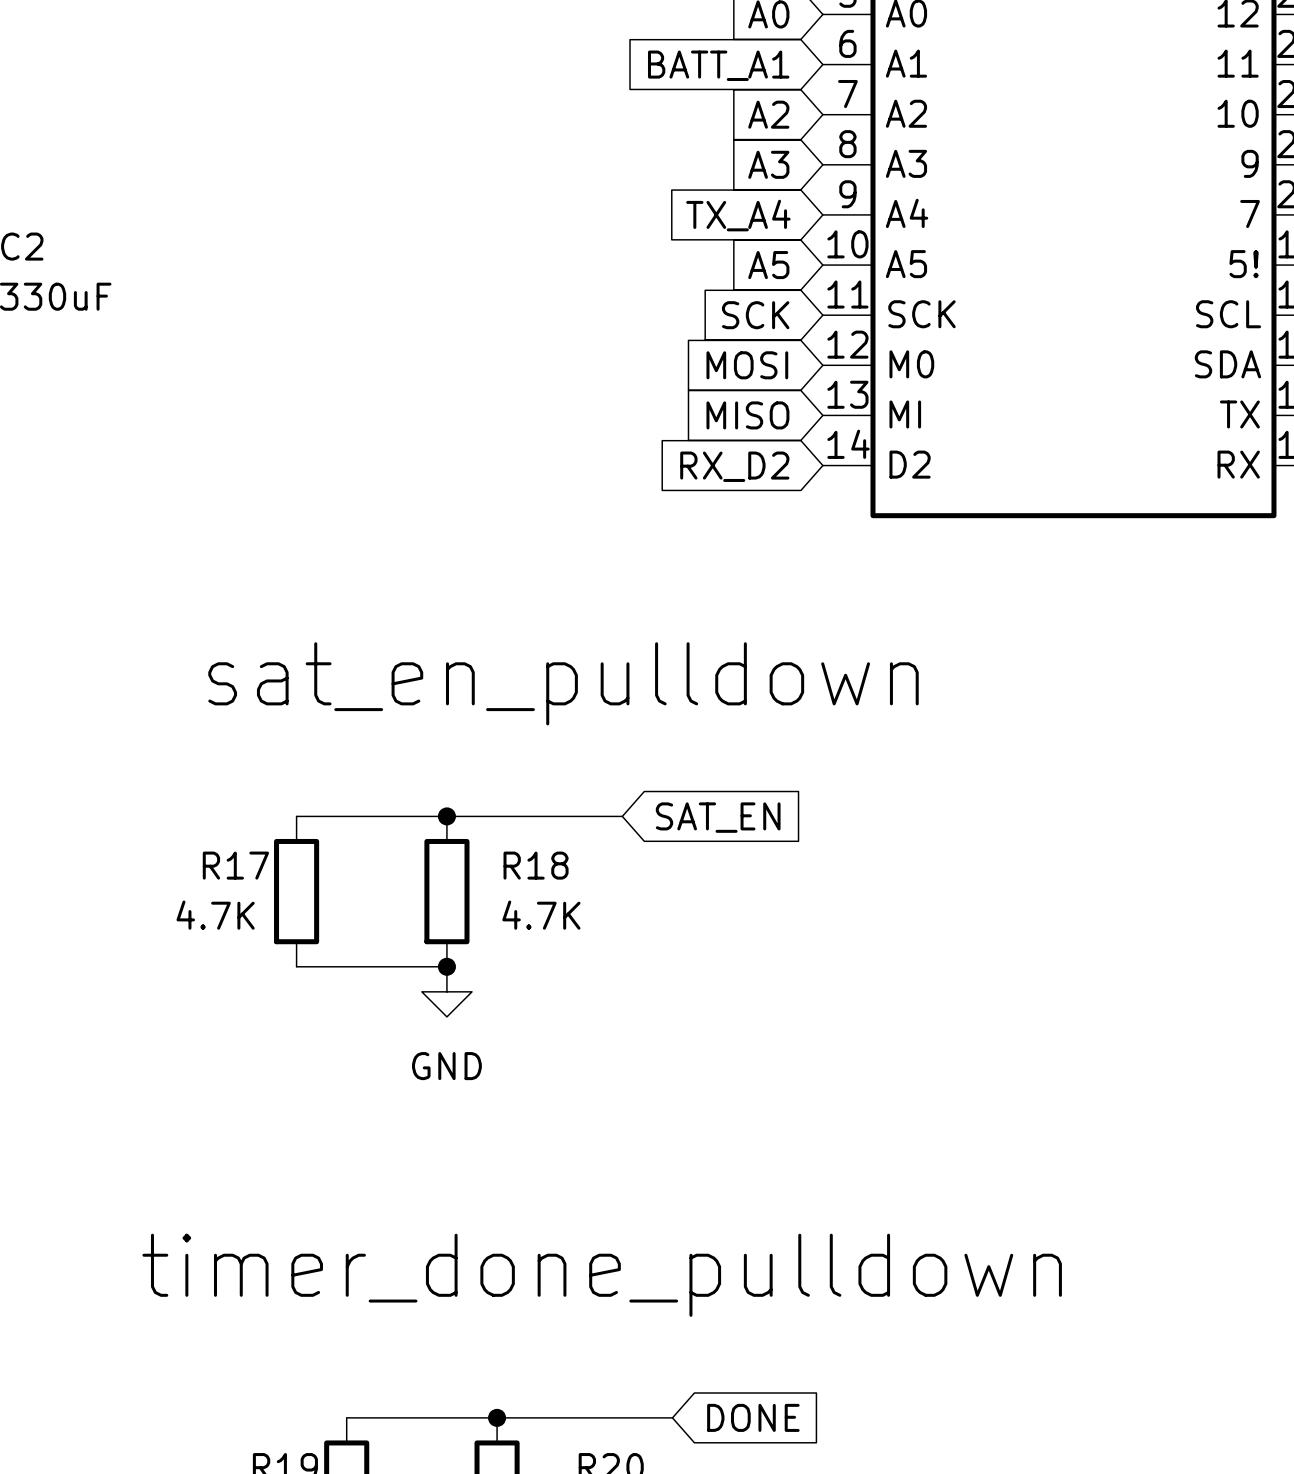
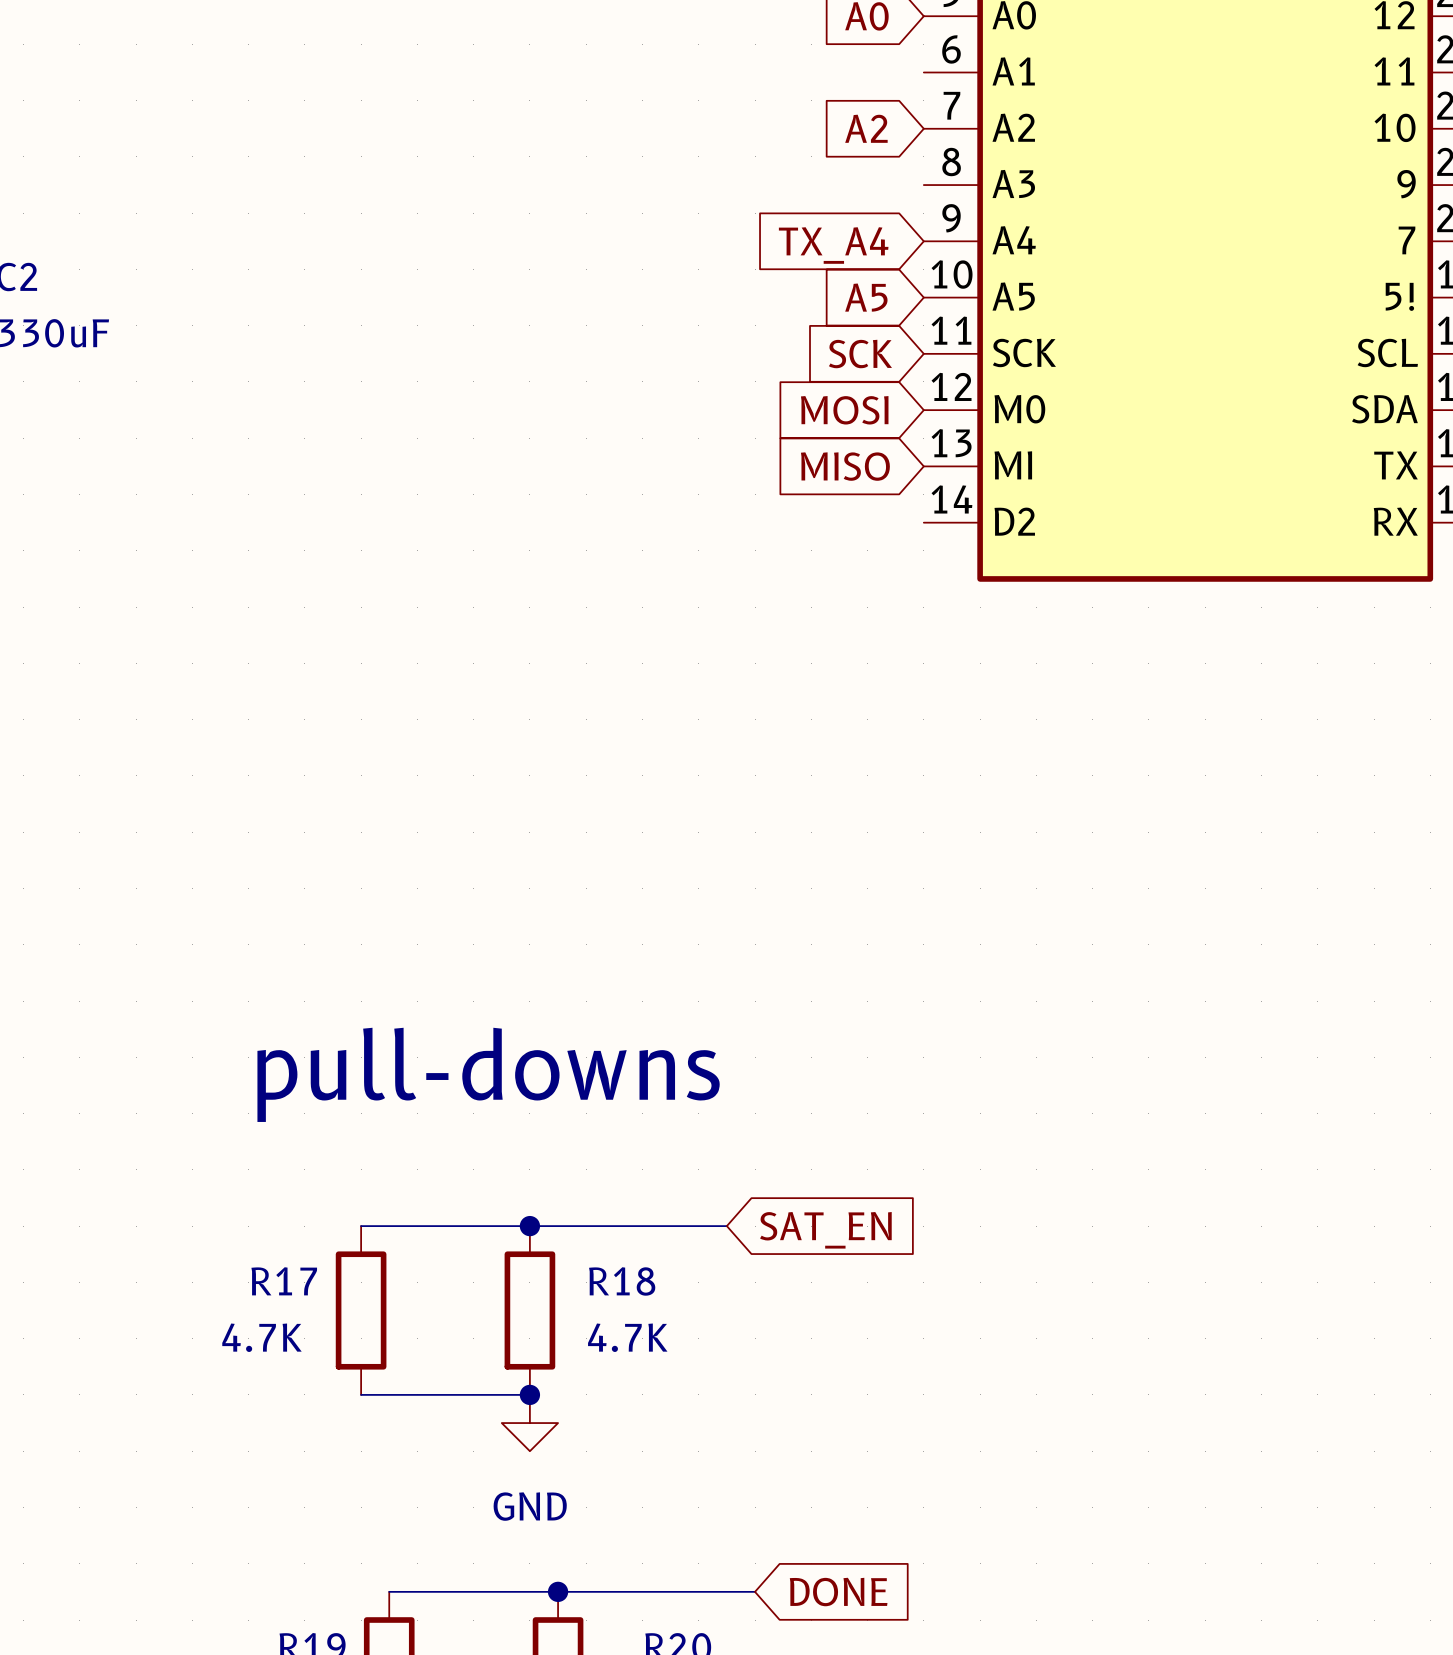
global label: BATT_A1 (718, 65) -> none
global label: A3 (768, 164) -> none
global label: RX_D2 (734, 466) -> none
text: sat_en_pulldown (563, 683) -> none
wire: (296, 816) (622, 816) -> (361, 1226) (726, 1226)
junction: (446, 816) -> none
global label position: SAT_EN (718, 817) -> SAT_EN (825, 1230)
R17 position: (296, 891) -> (361, 1310)
R18 position: (446, 891) -> (529, 1310)
text: none -> pull-downs (488, 1074)
wire: (296, 966) (446, 966) -> (361, 1394) (529, 1394)
junction: (446, 966) -> none
power symbol position: GND (446, 991) -> GND (529, 1423)
junction: none -> (529, 1226)
junction: none -> (529, 1394)
text: timer_done_pulldown (602, 1275) -> none

